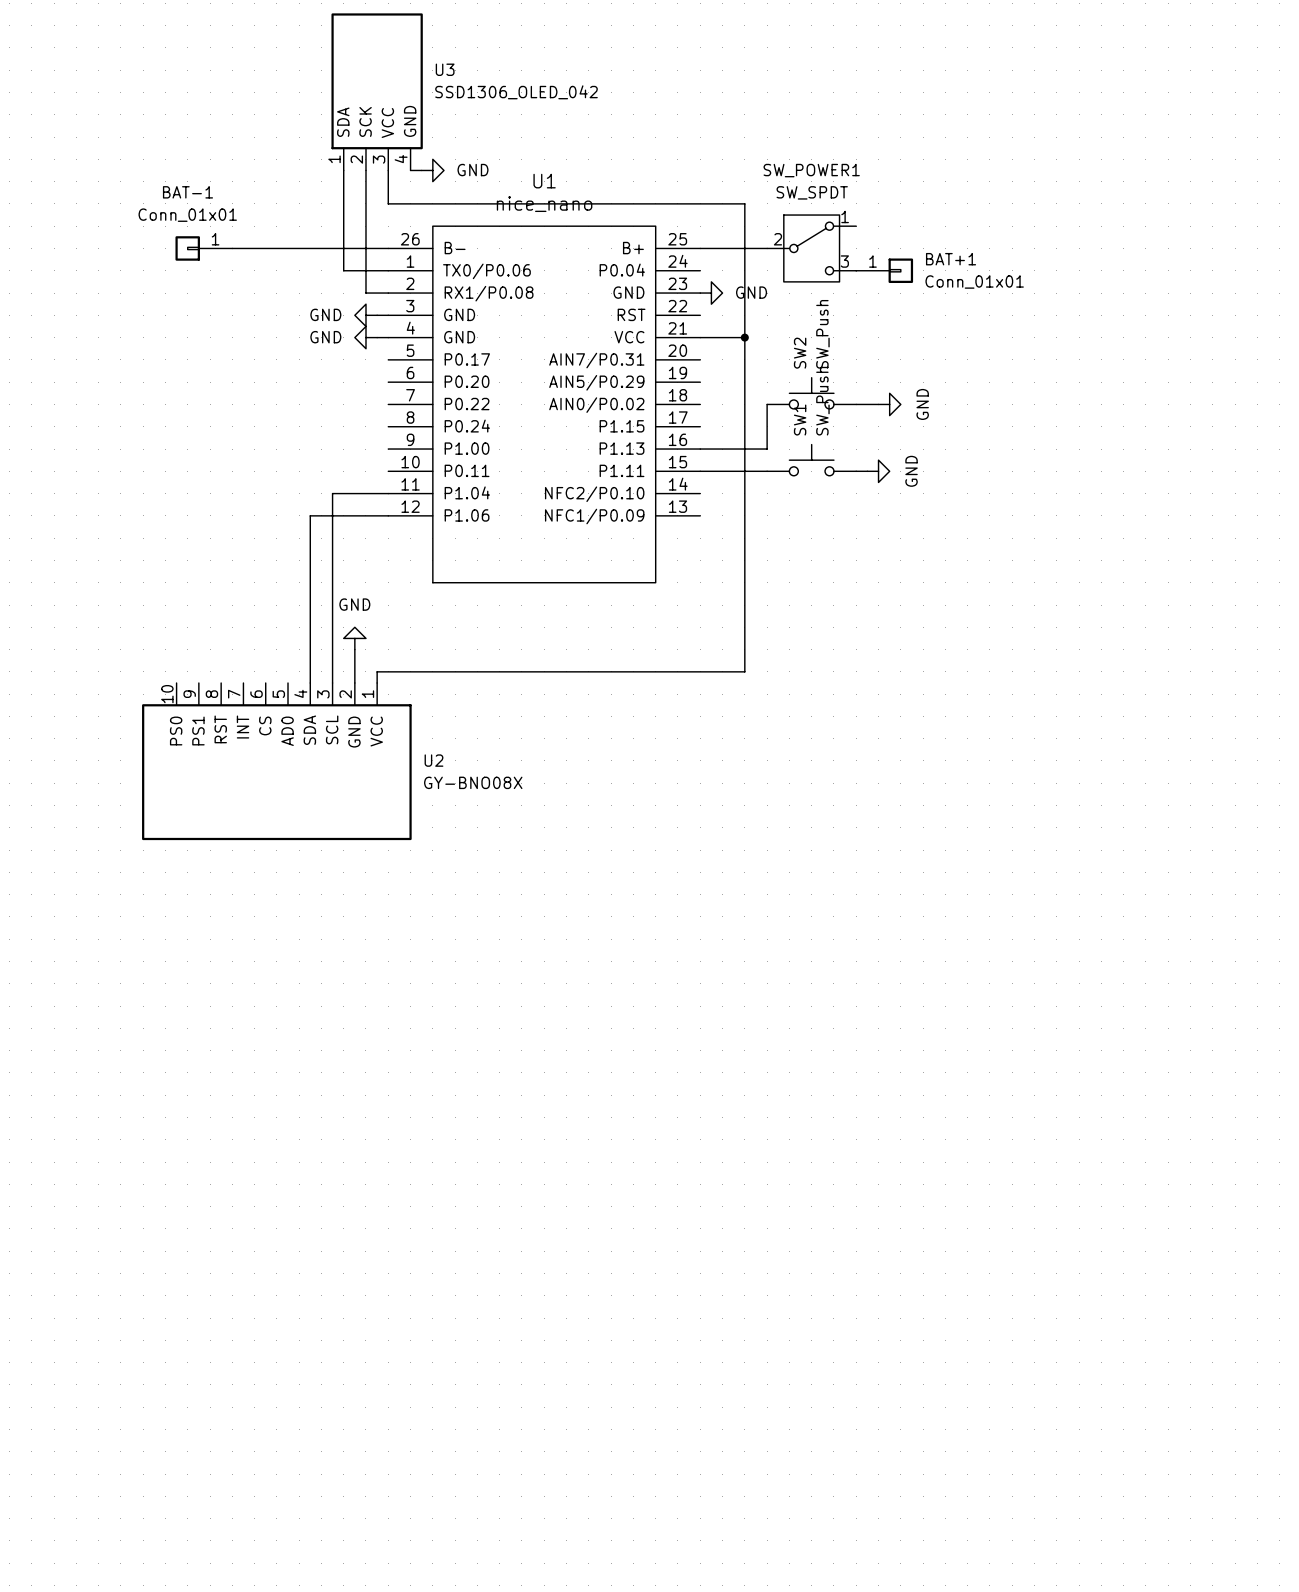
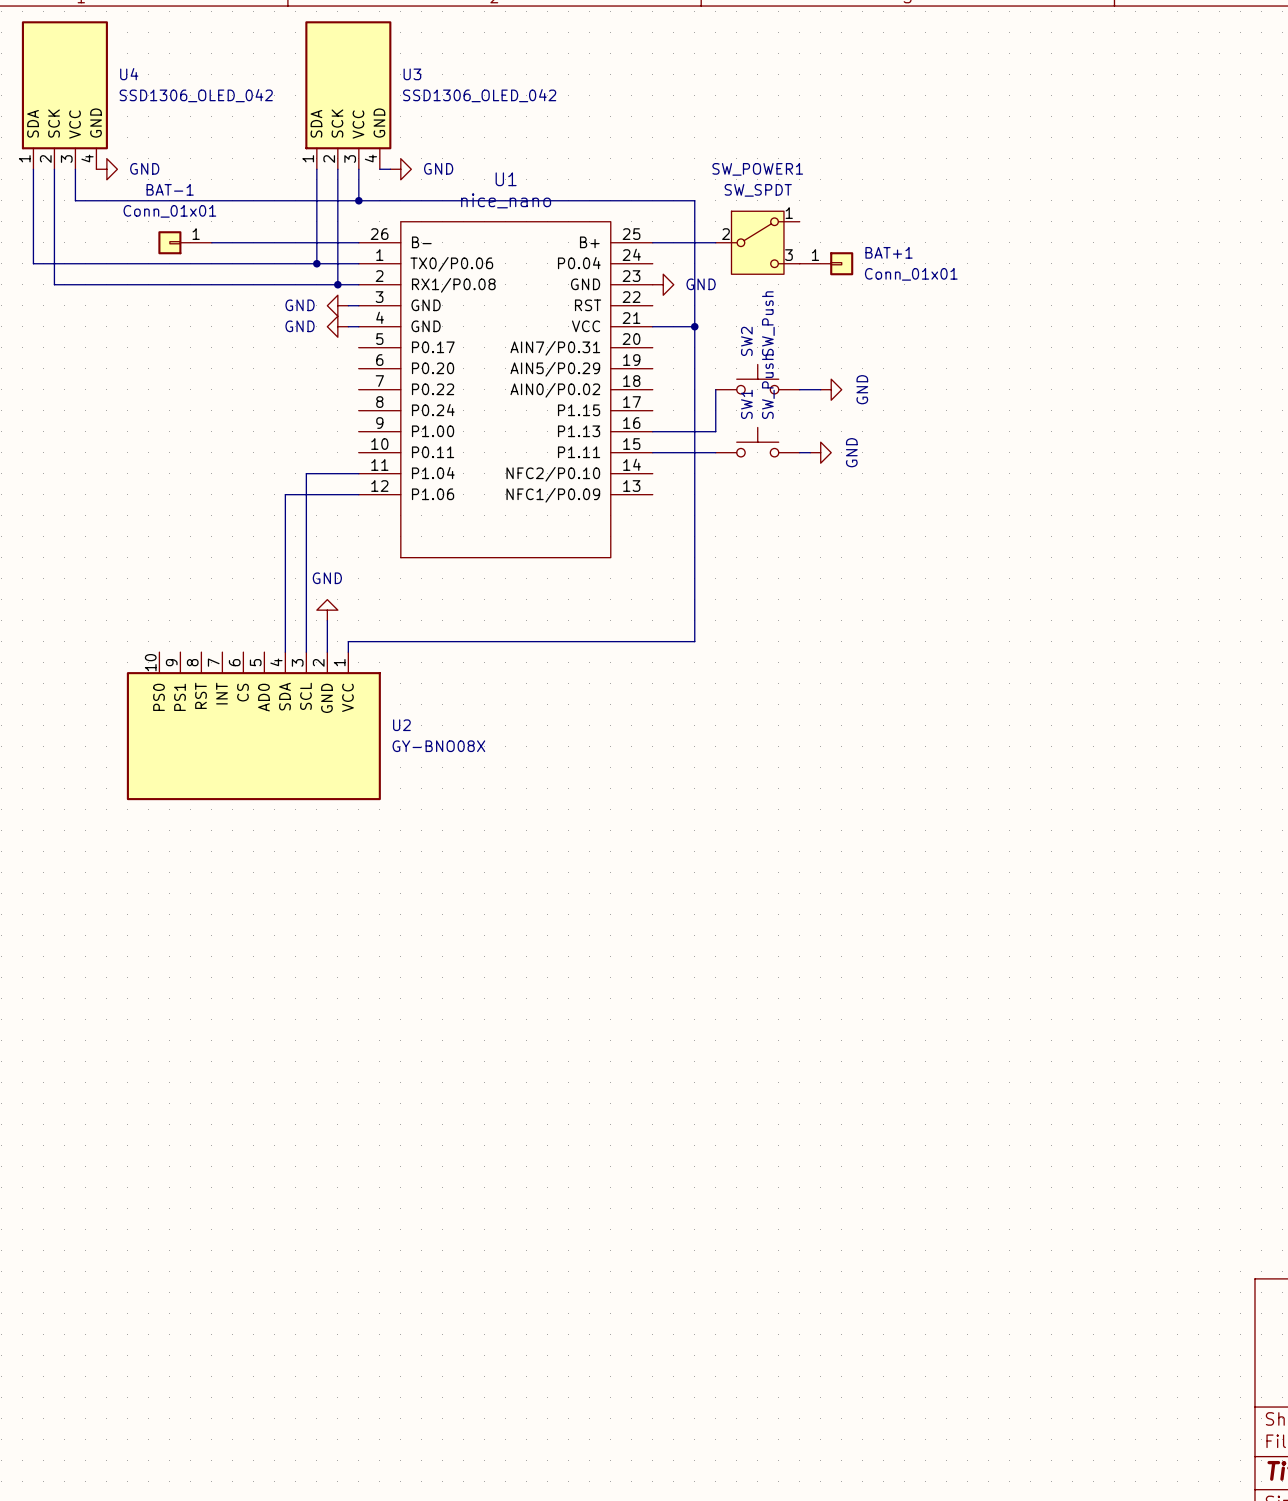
U4: none -> SSD1306_OLED_042 (64, 95)
wire: none -> (33, 169) (33, 263) (316, 263)
wire: none -> (54, 169) (54, 284) (337, 284)
wire: none -> (75, 169) (75, 200) (358, 200)
power symbol: none -> GND (106, 169)
junction: none -> (358, 200)
junction: none -> (316, 263)
junction: none -> (337, 284)

